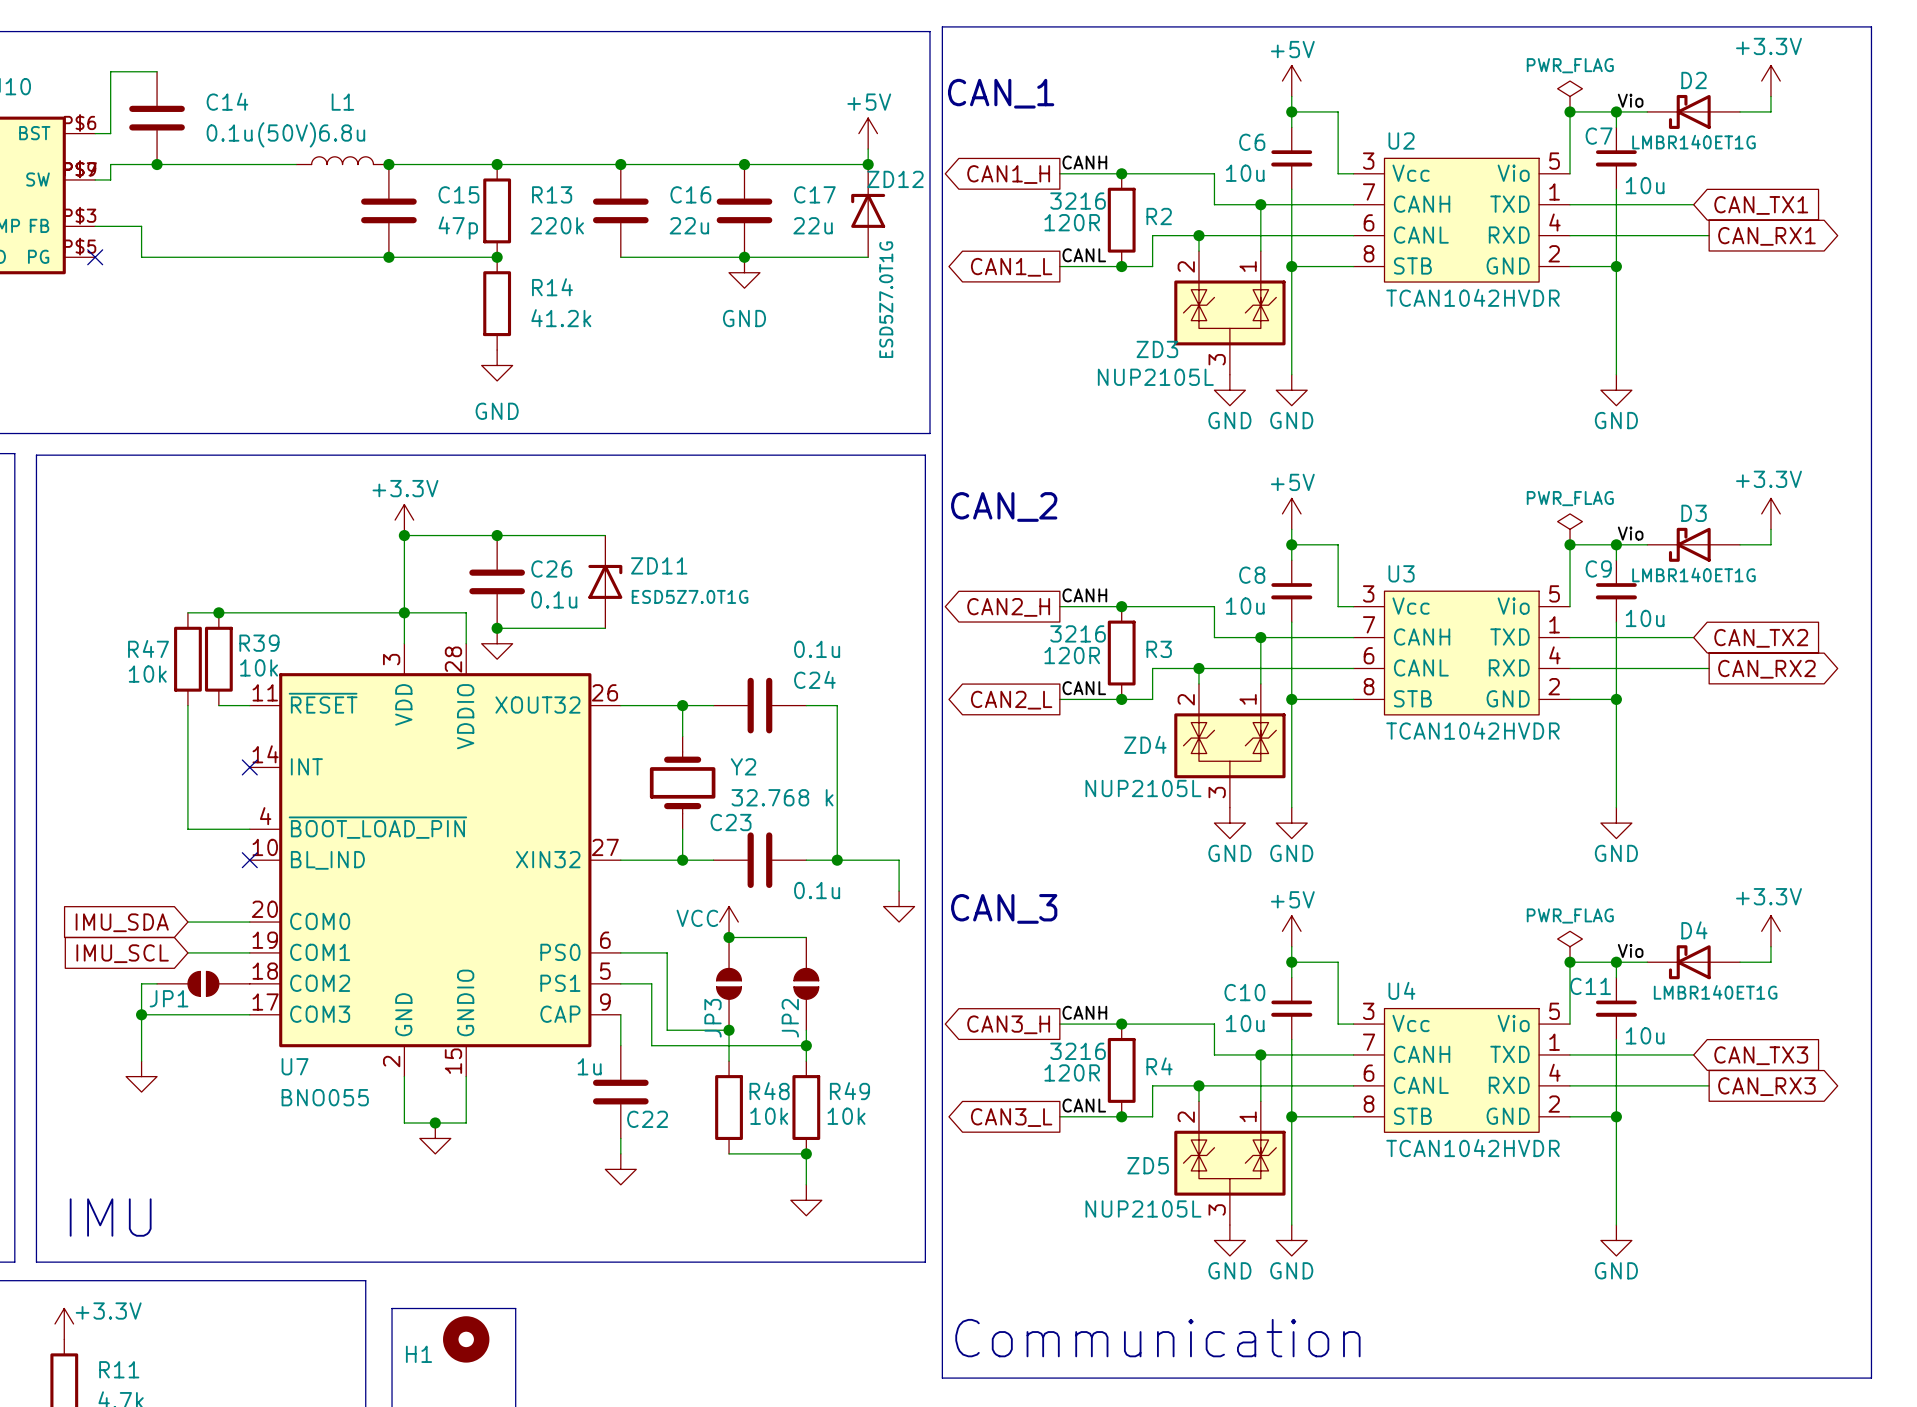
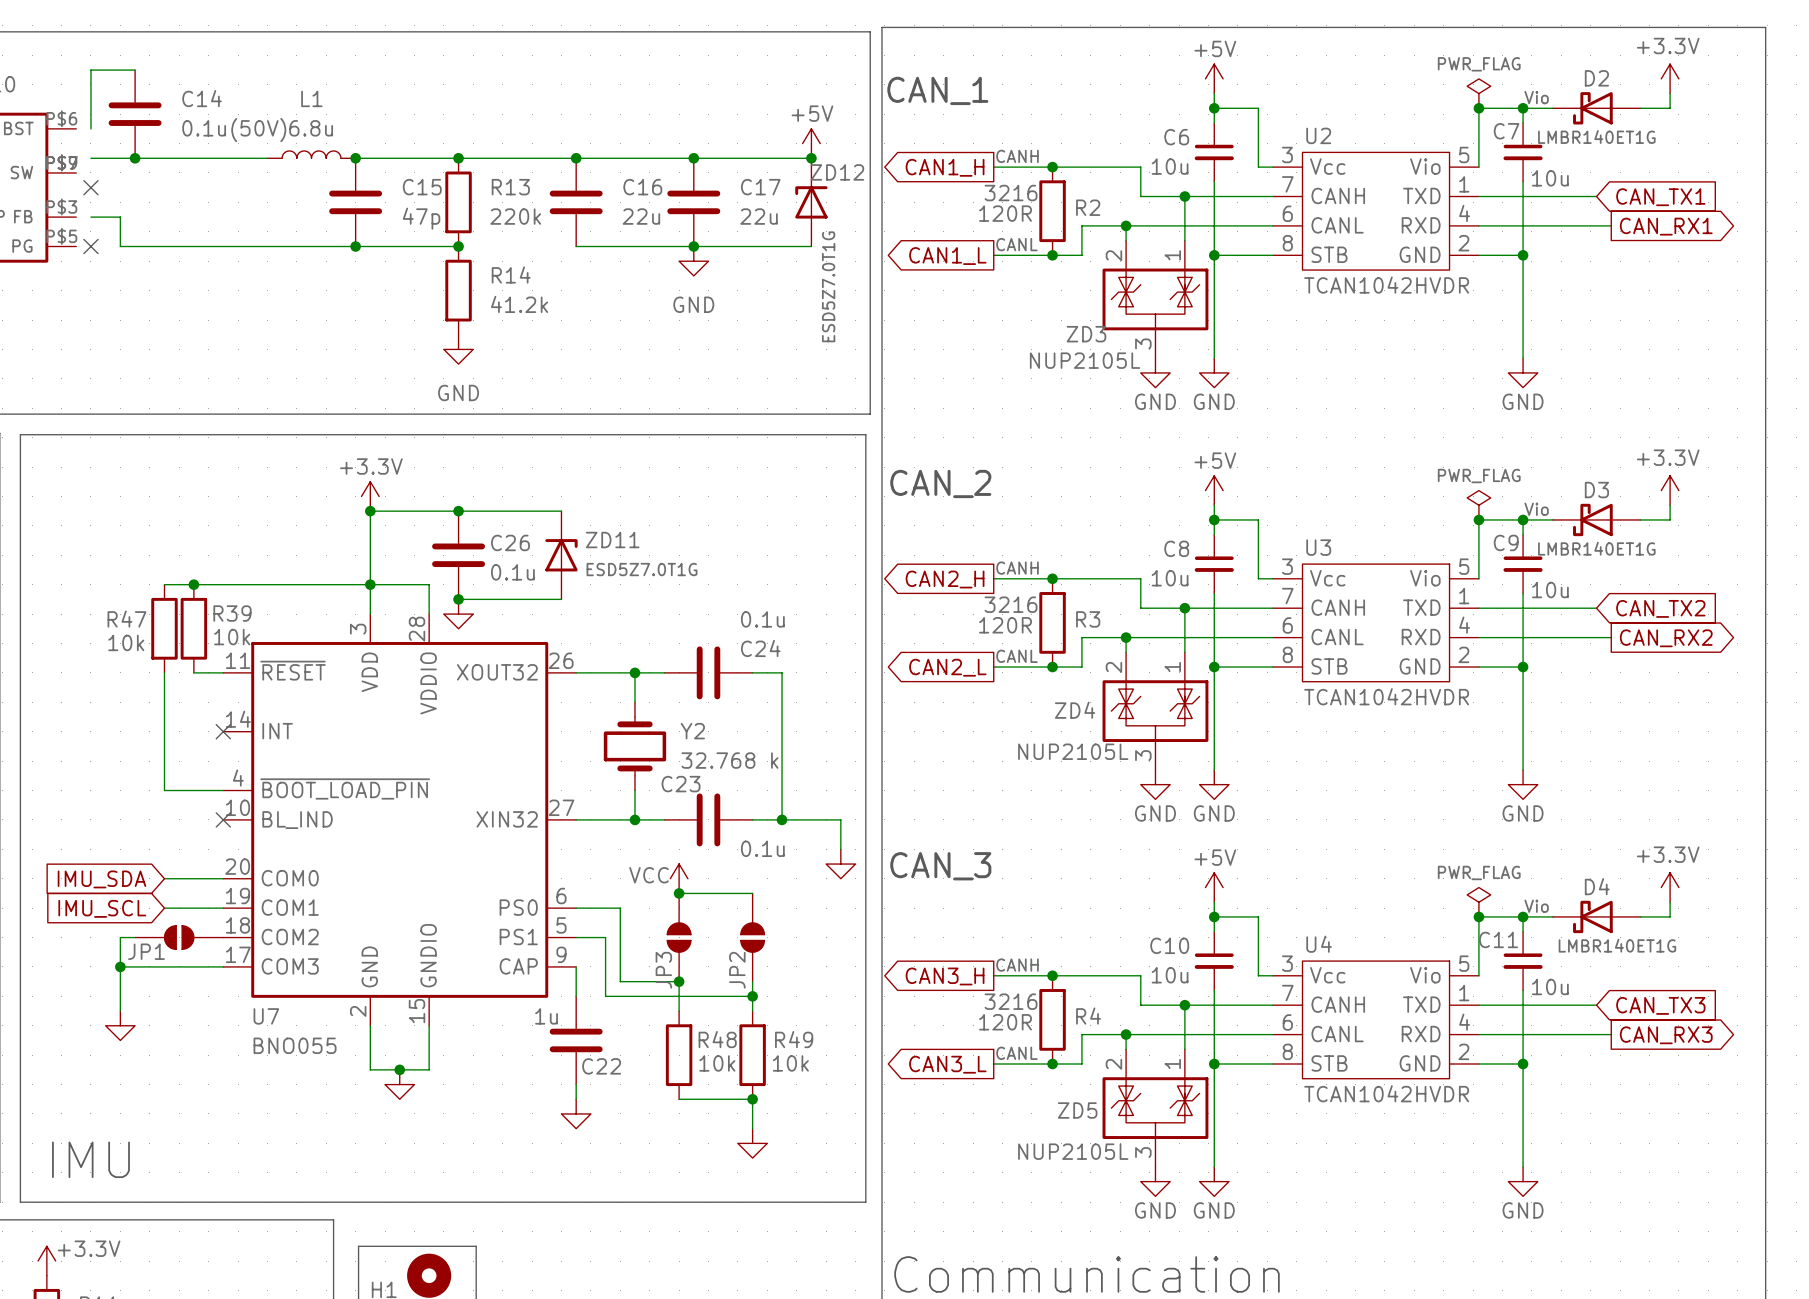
wire: (95, 133) (110, 133) -> none
power symbol position: +5V (868, 133) -> +5V (811, 143)
wire: (110, 164) (110, 179) (95, 179) -> none
no-connect mark: none -> (90, 187)
wire: (95, 226) (110, 226) -> none
no-connect mark position: (95, 257) -> (90, 246)

